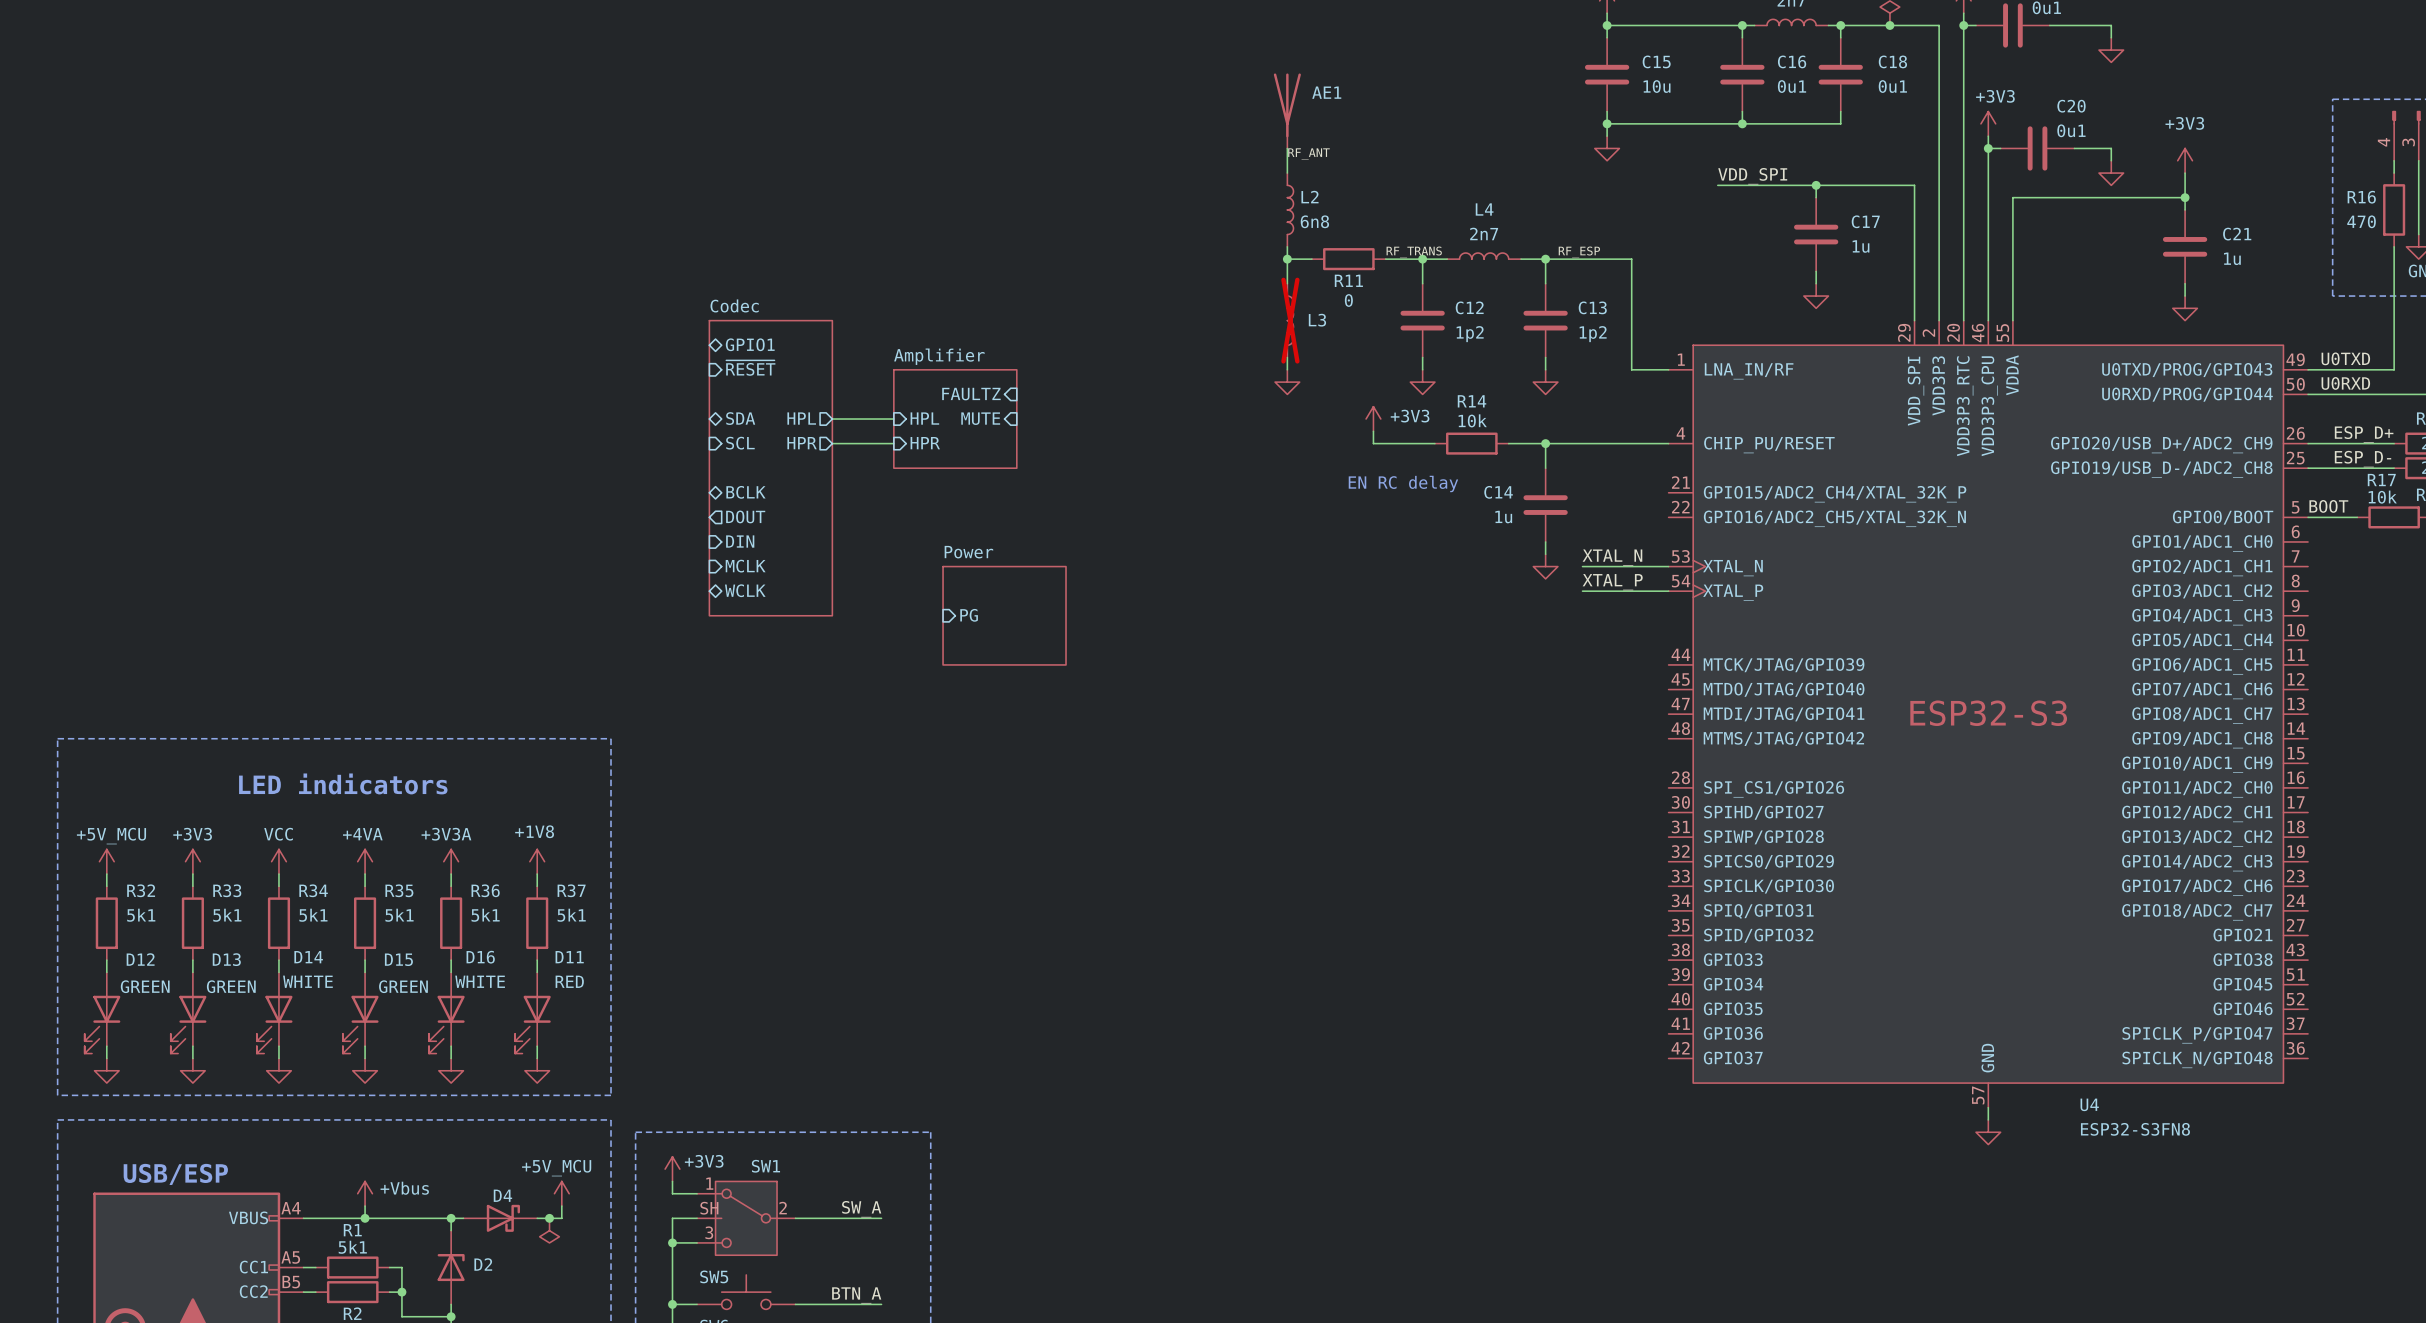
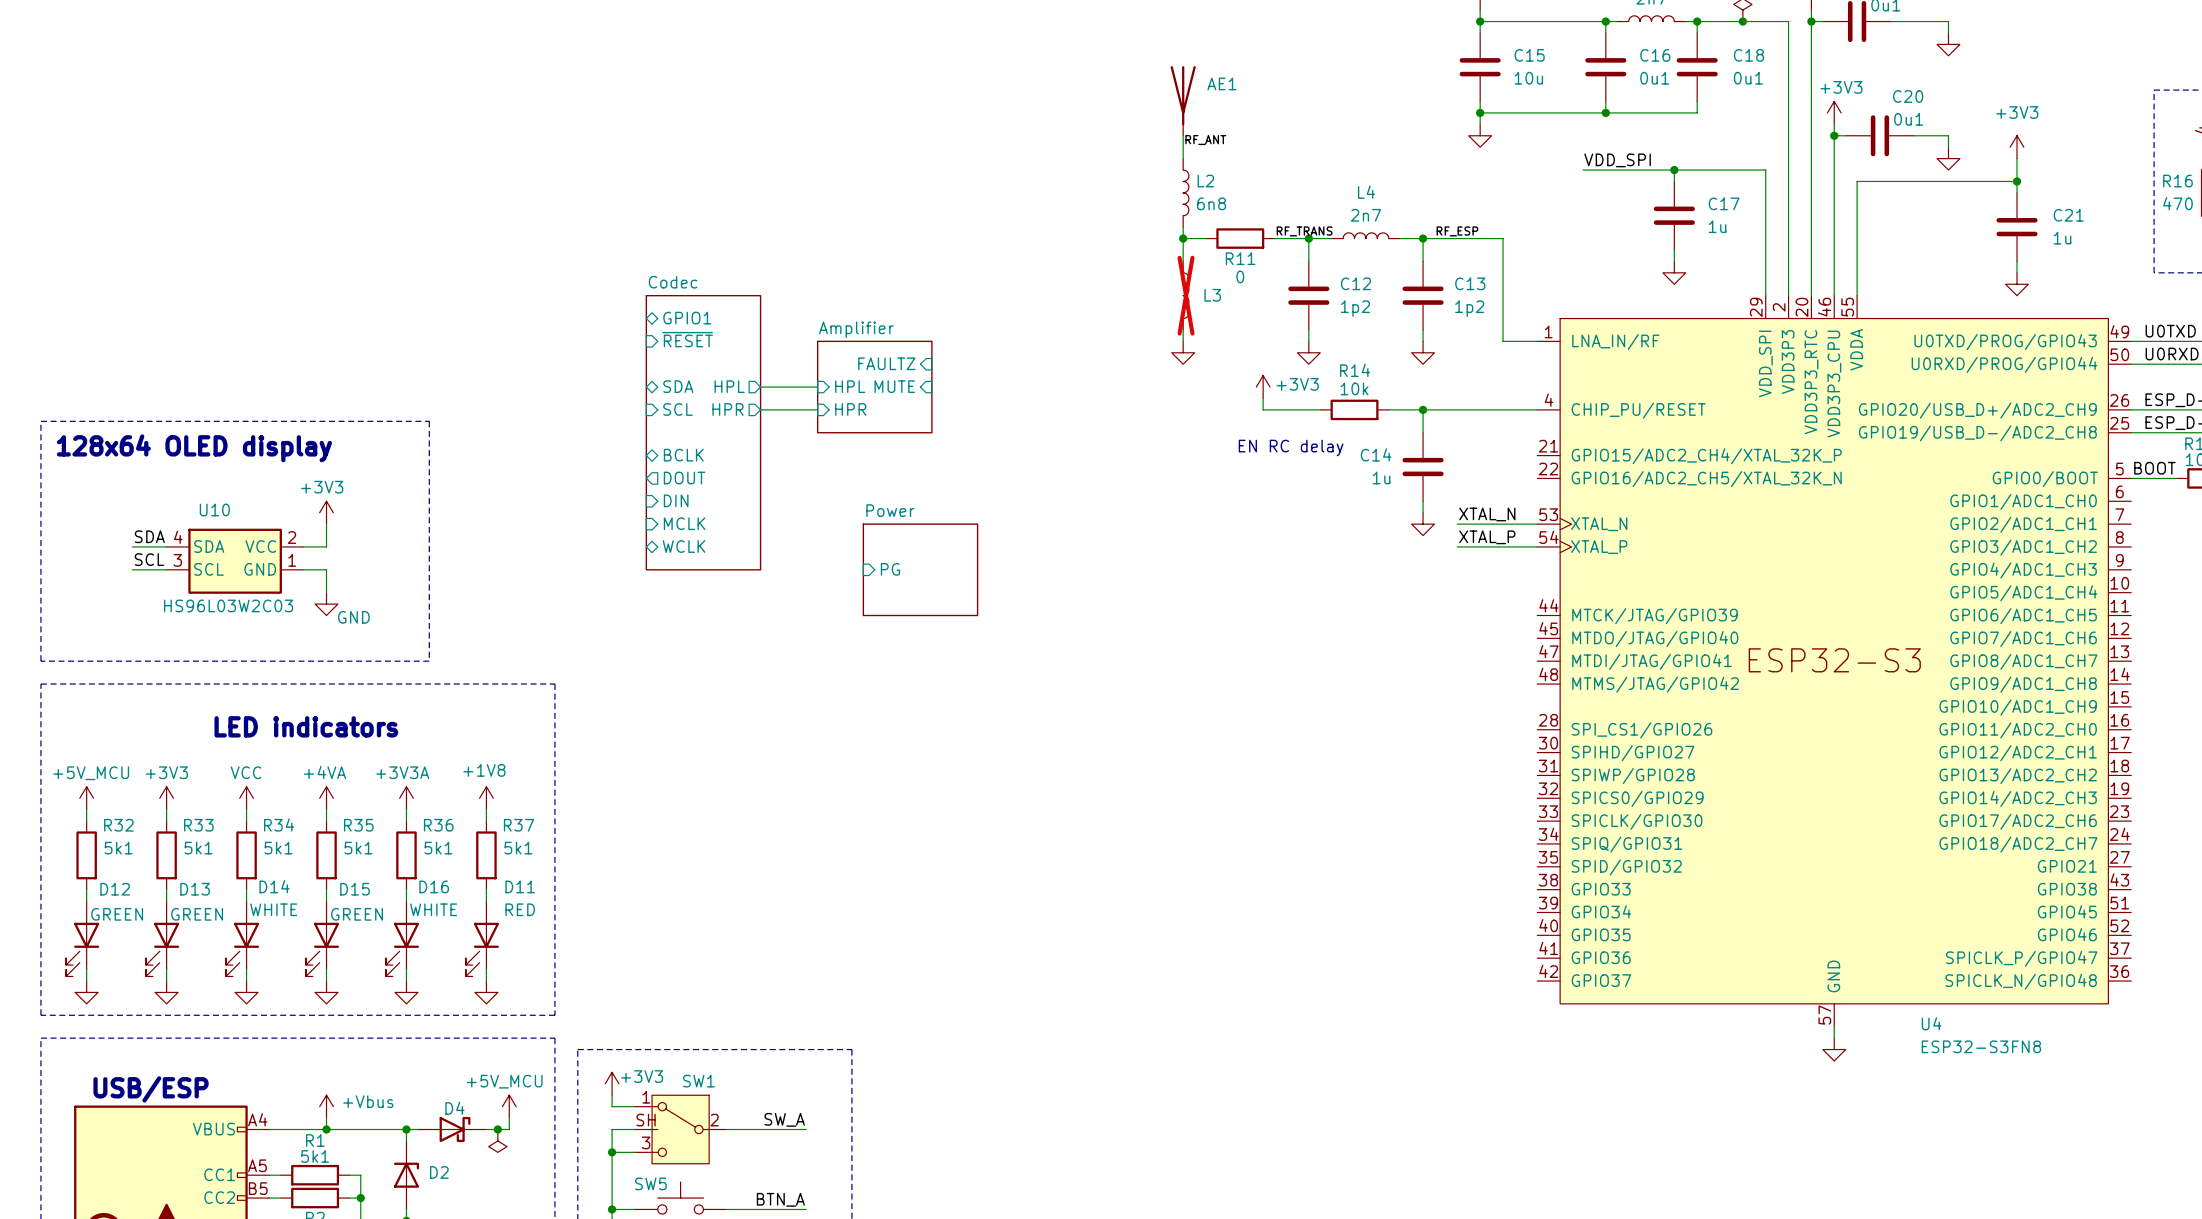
line: none -> (40, 421) (429, 421) (429, 661) (40, 661) (40, 421)
text: none -> 128x64 OLED display (194, 448)
power symbol: none -> +3V3 (326, 512)
wire: none -> (326, 524) (326, 546) (303, 546)
label: none -> SDA (149, 536)
wire: none -> (132, 546) (166, 546)
label: none -> SCL (149, 559)
U10: none -> HS96L03W2C03 (235, 561)
wire: none -> (132, 569) (166, 569)
wire: none -> (303, 569) (326, 569) (326, 592)
power symbol: none -> GND (326, 604)

